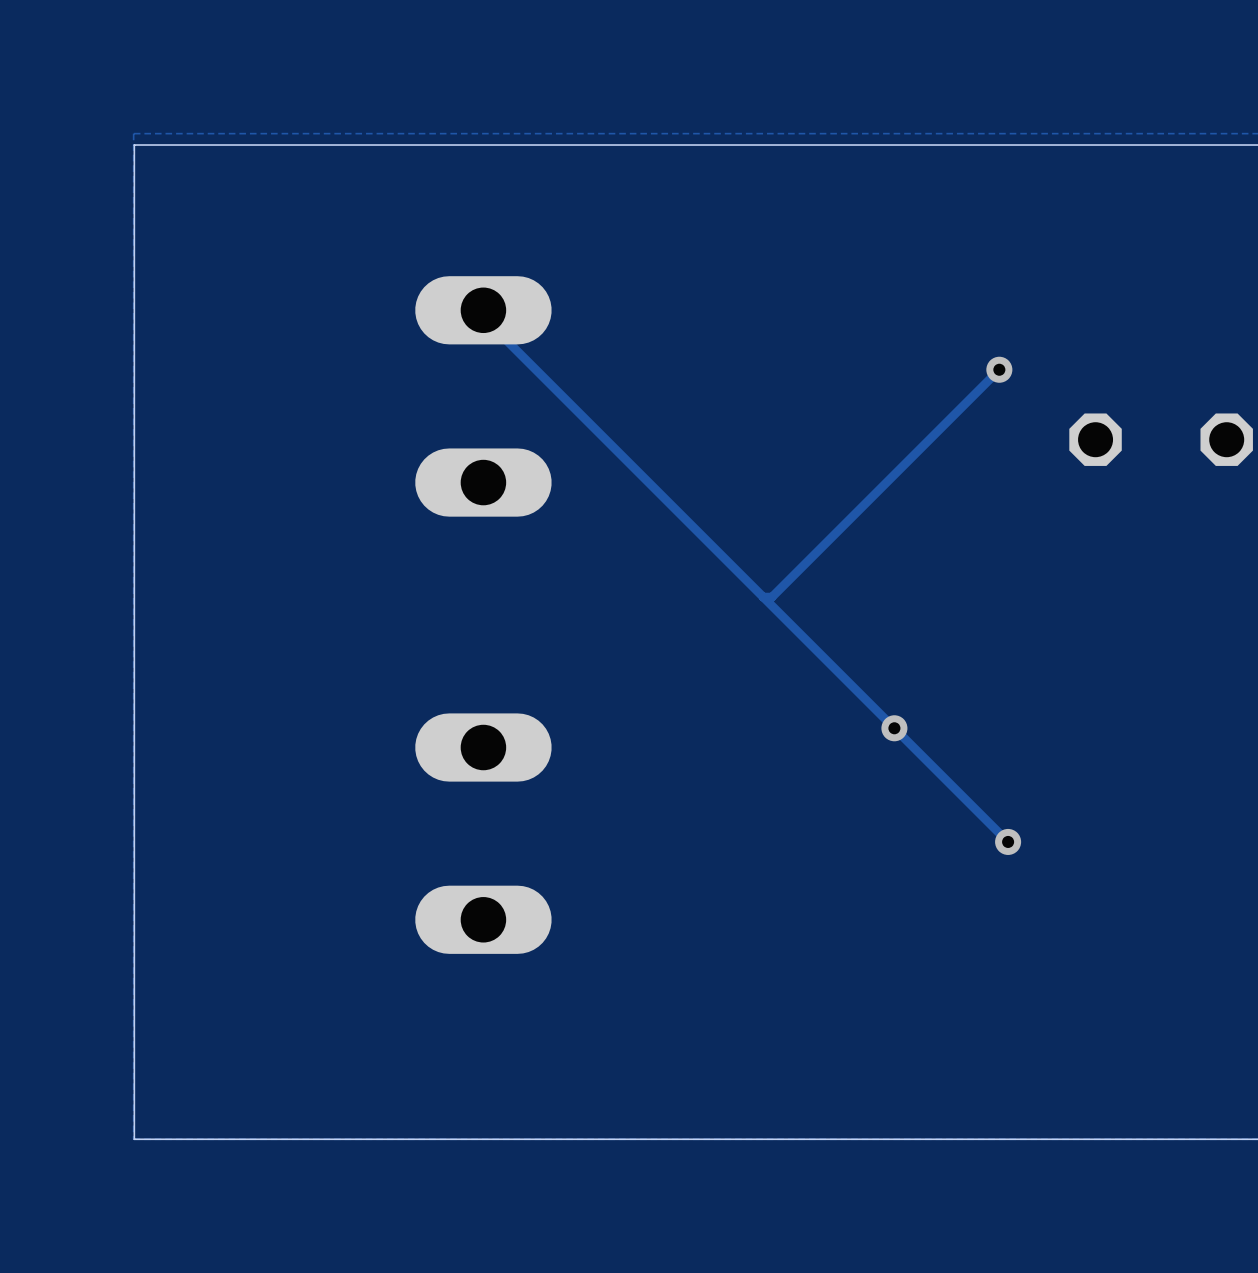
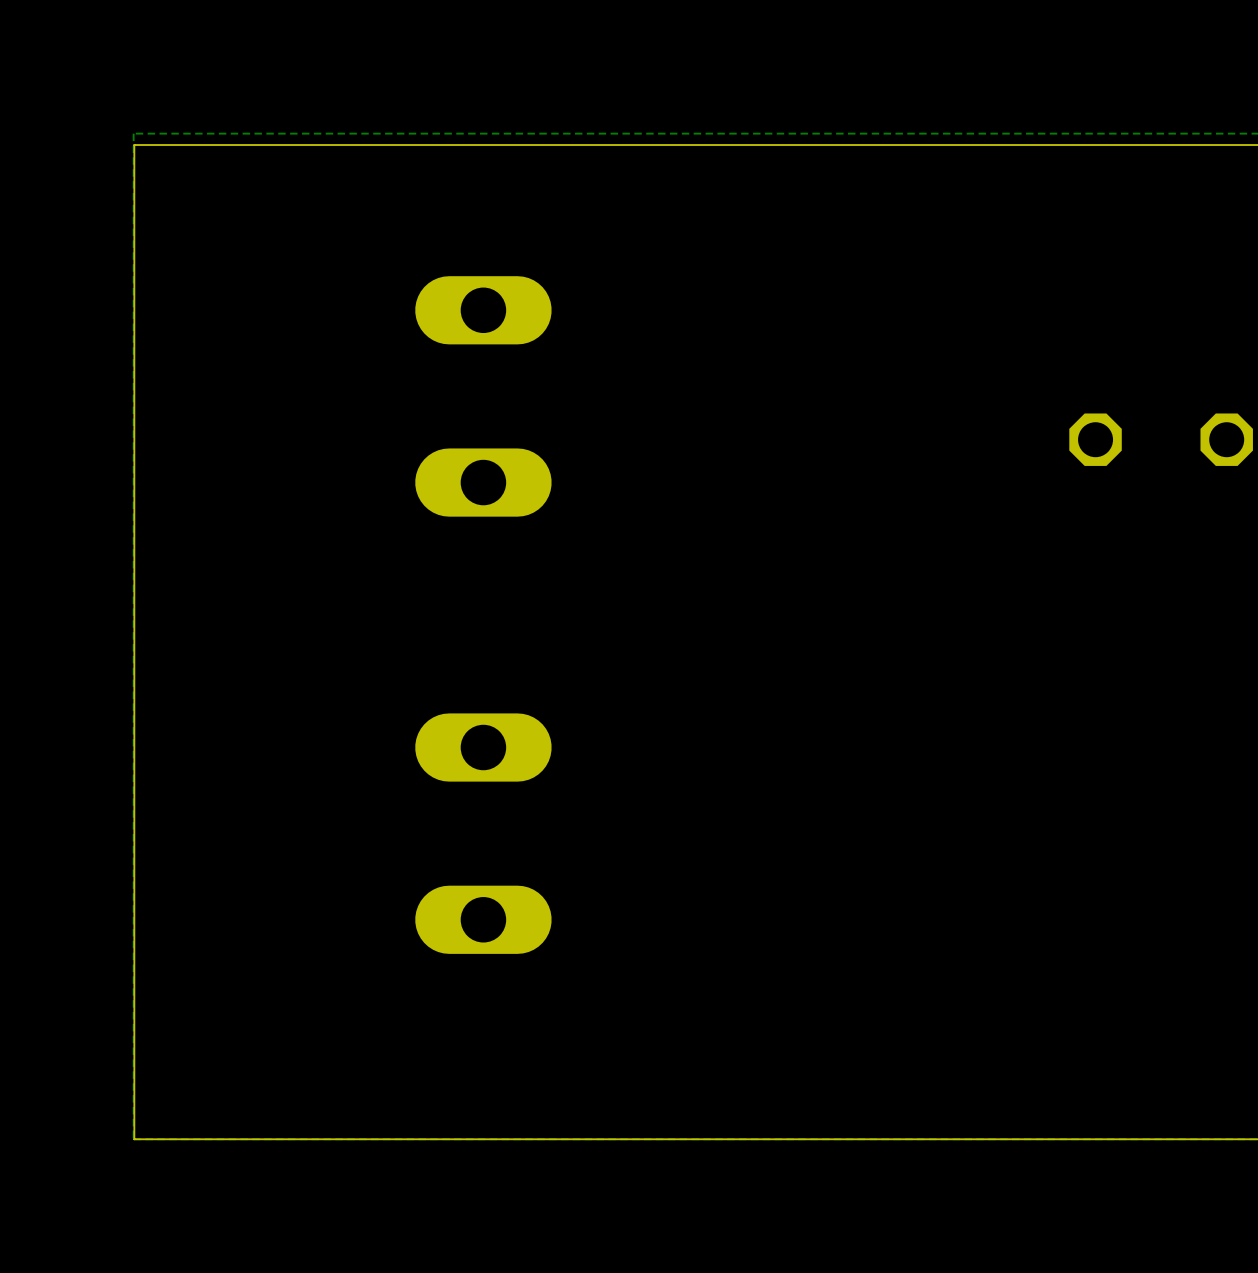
track: (483, 310) (483, 317) (1008, 841) -> none
track: (999, 369) (771, 597) (763, 597) -> none
via: (999, 369) -> none
via: (894, 728) -> none
via: (1008, 841) -> none

